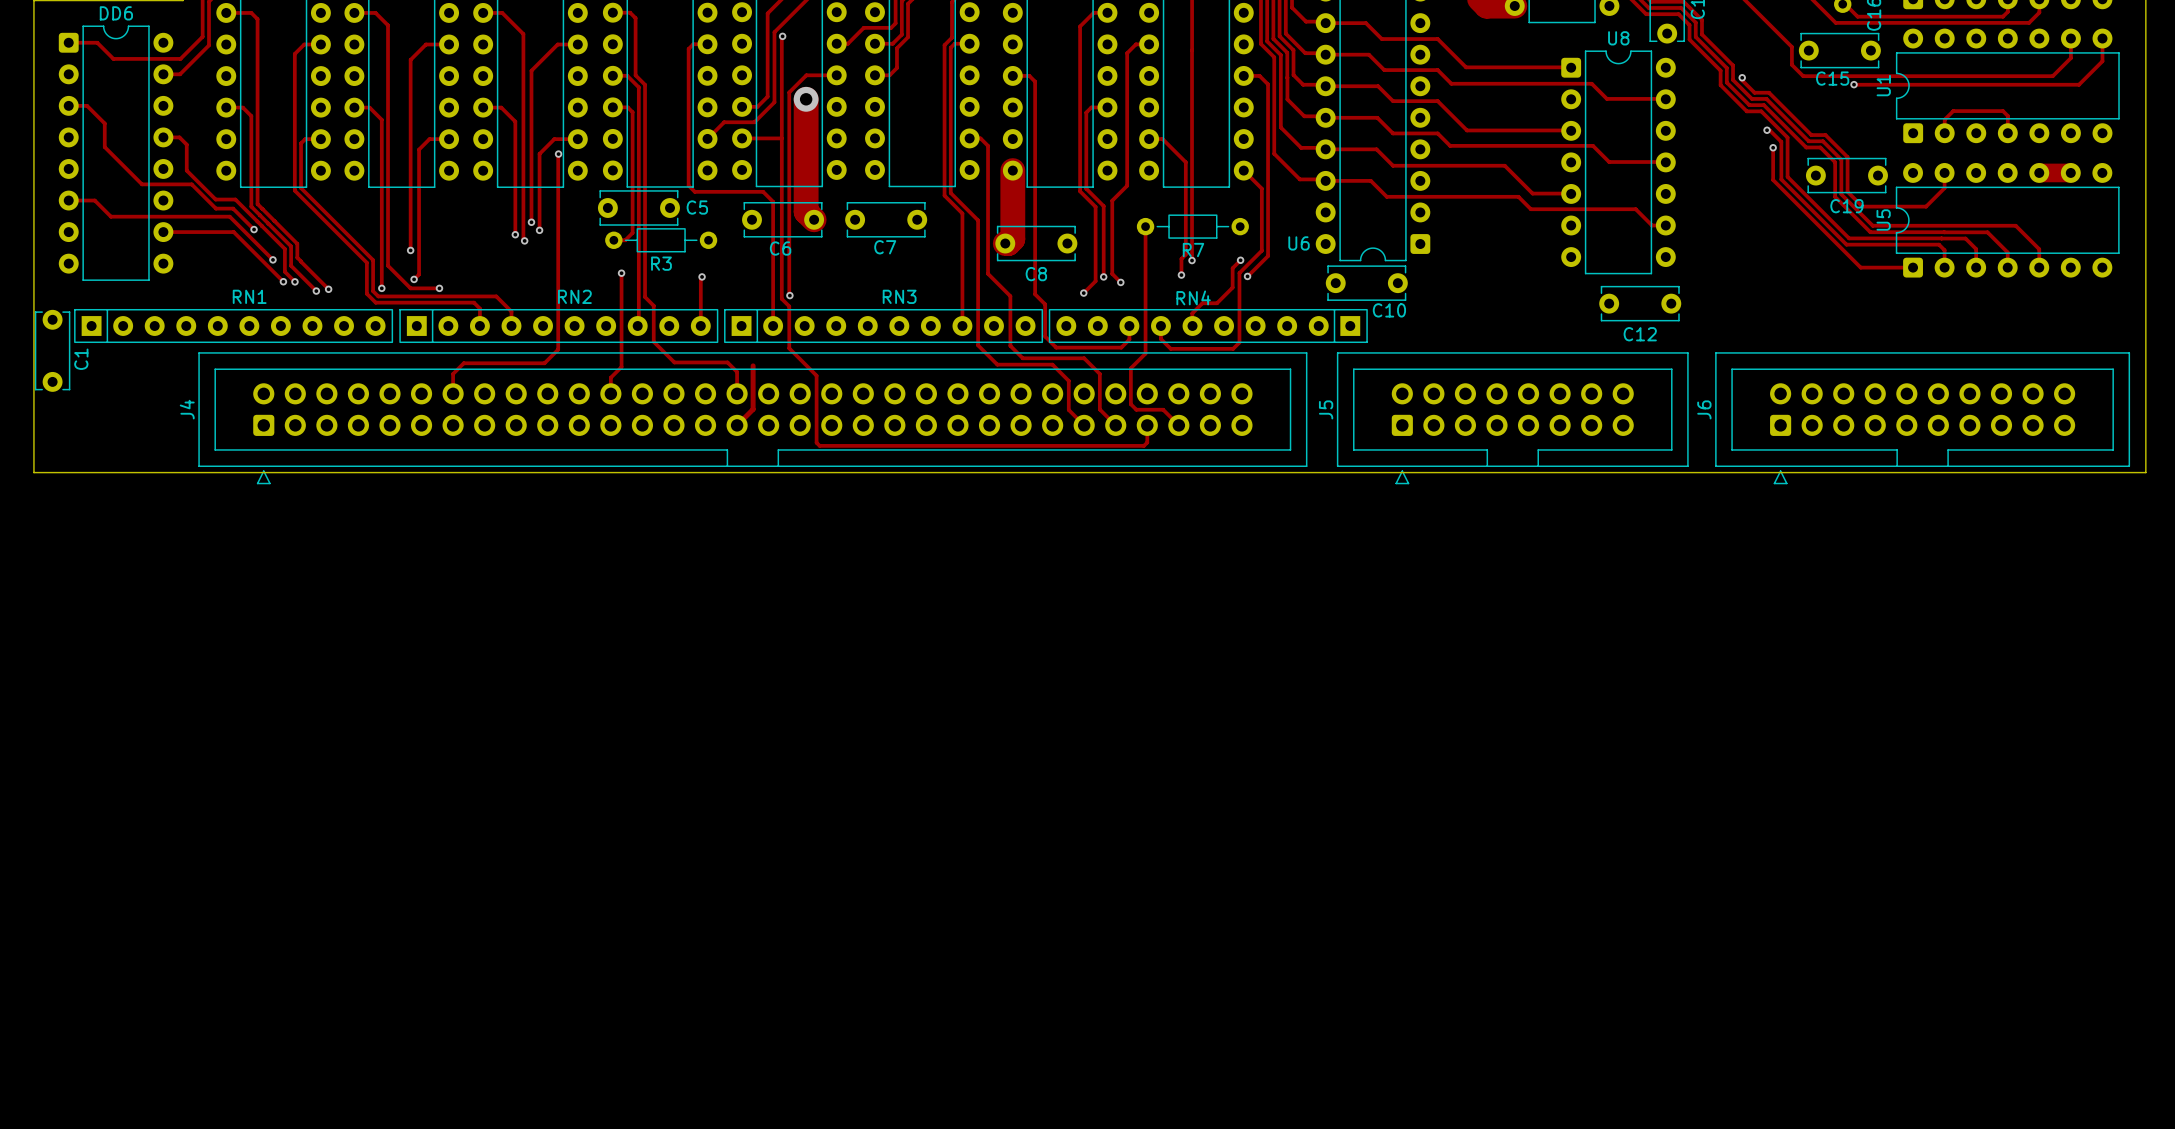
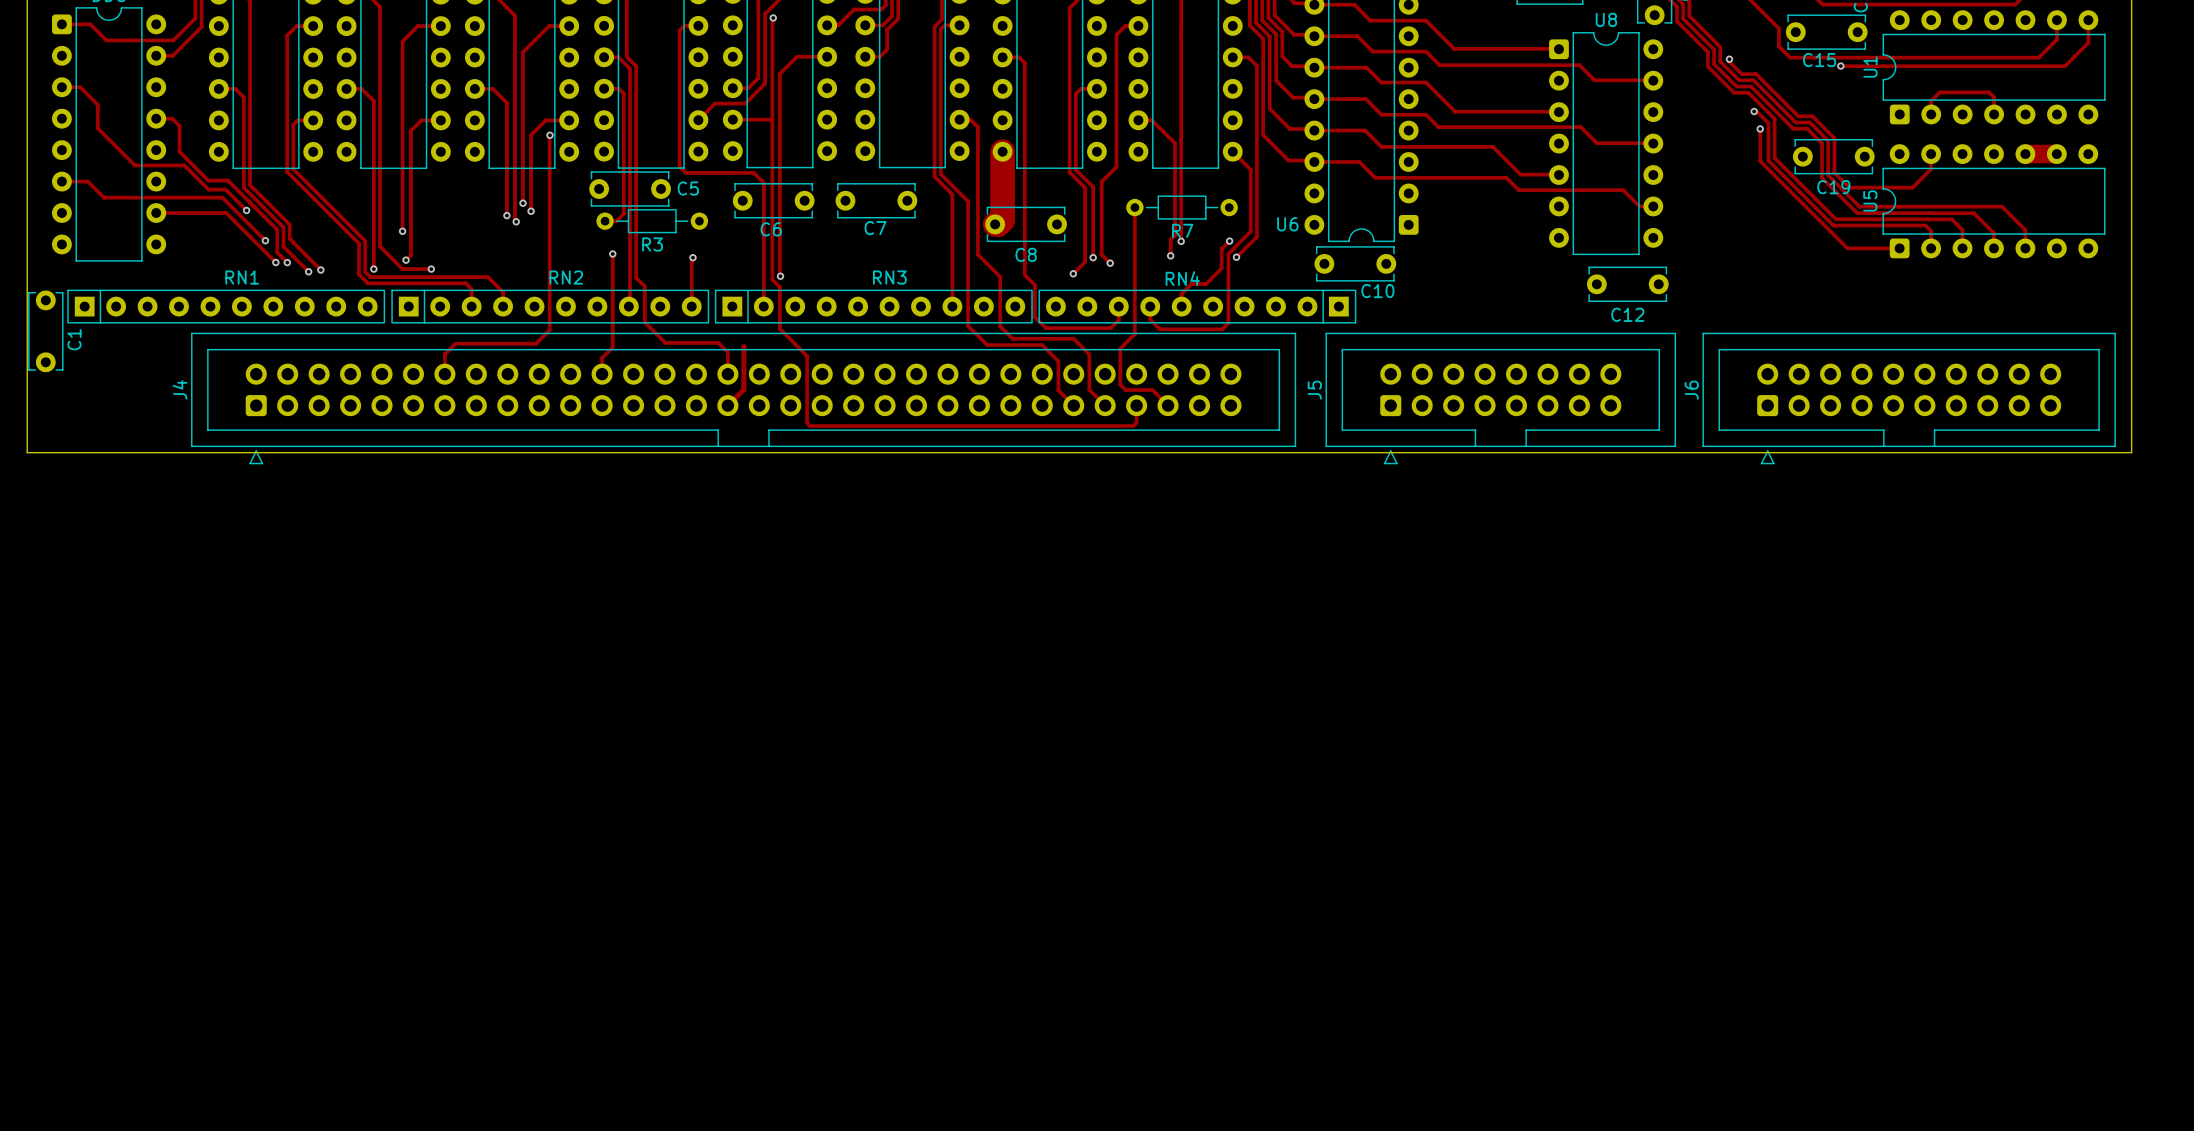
track: (806, 99) (806, 211) (814, 219) -> none
via: (806, 99) -> none

